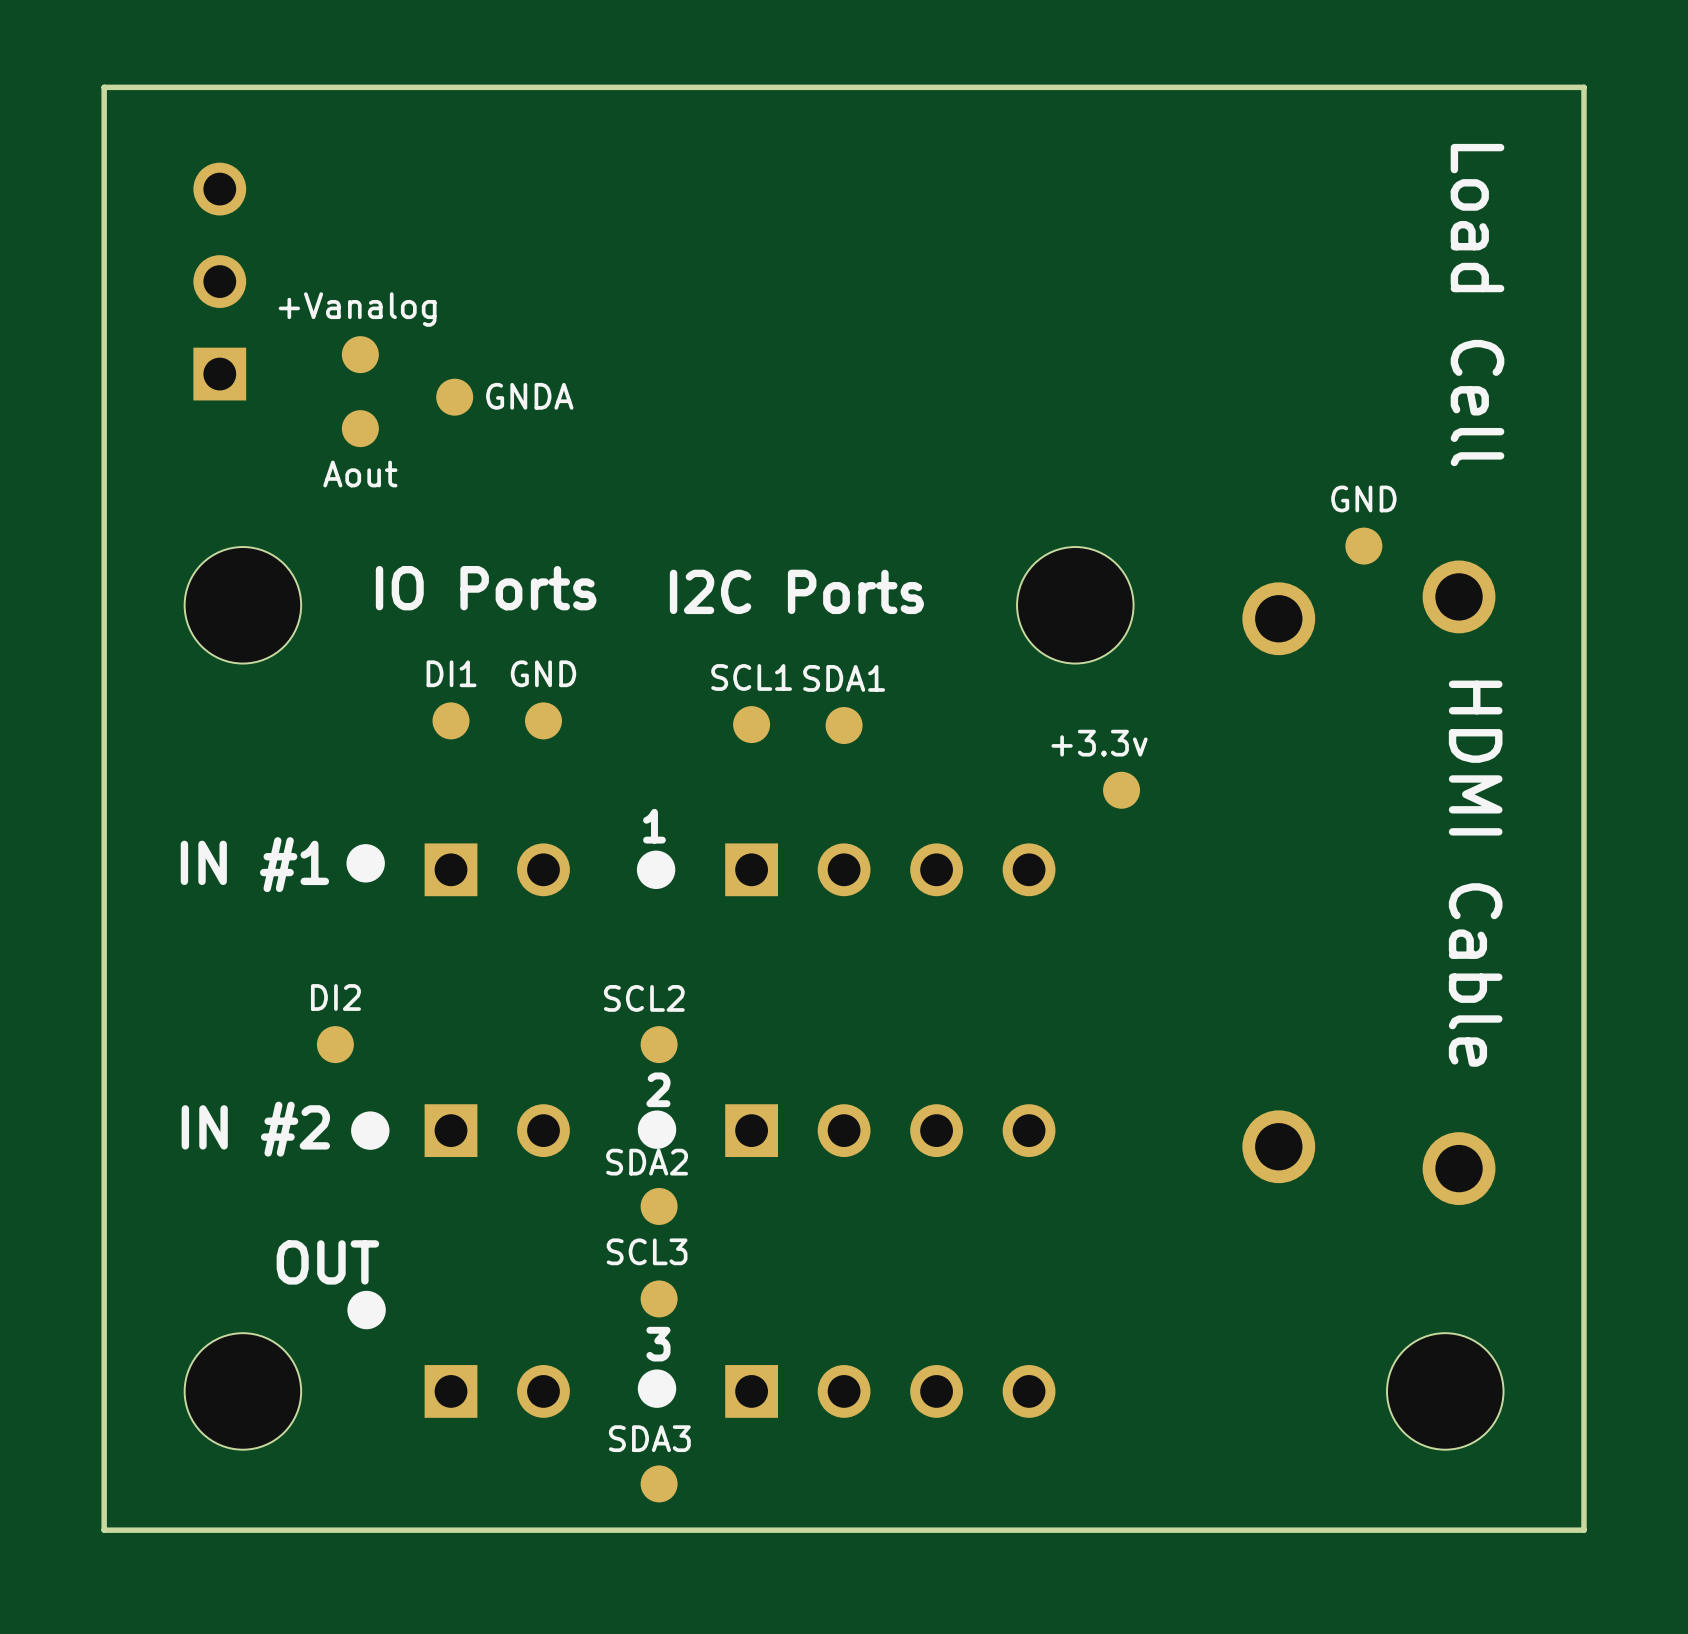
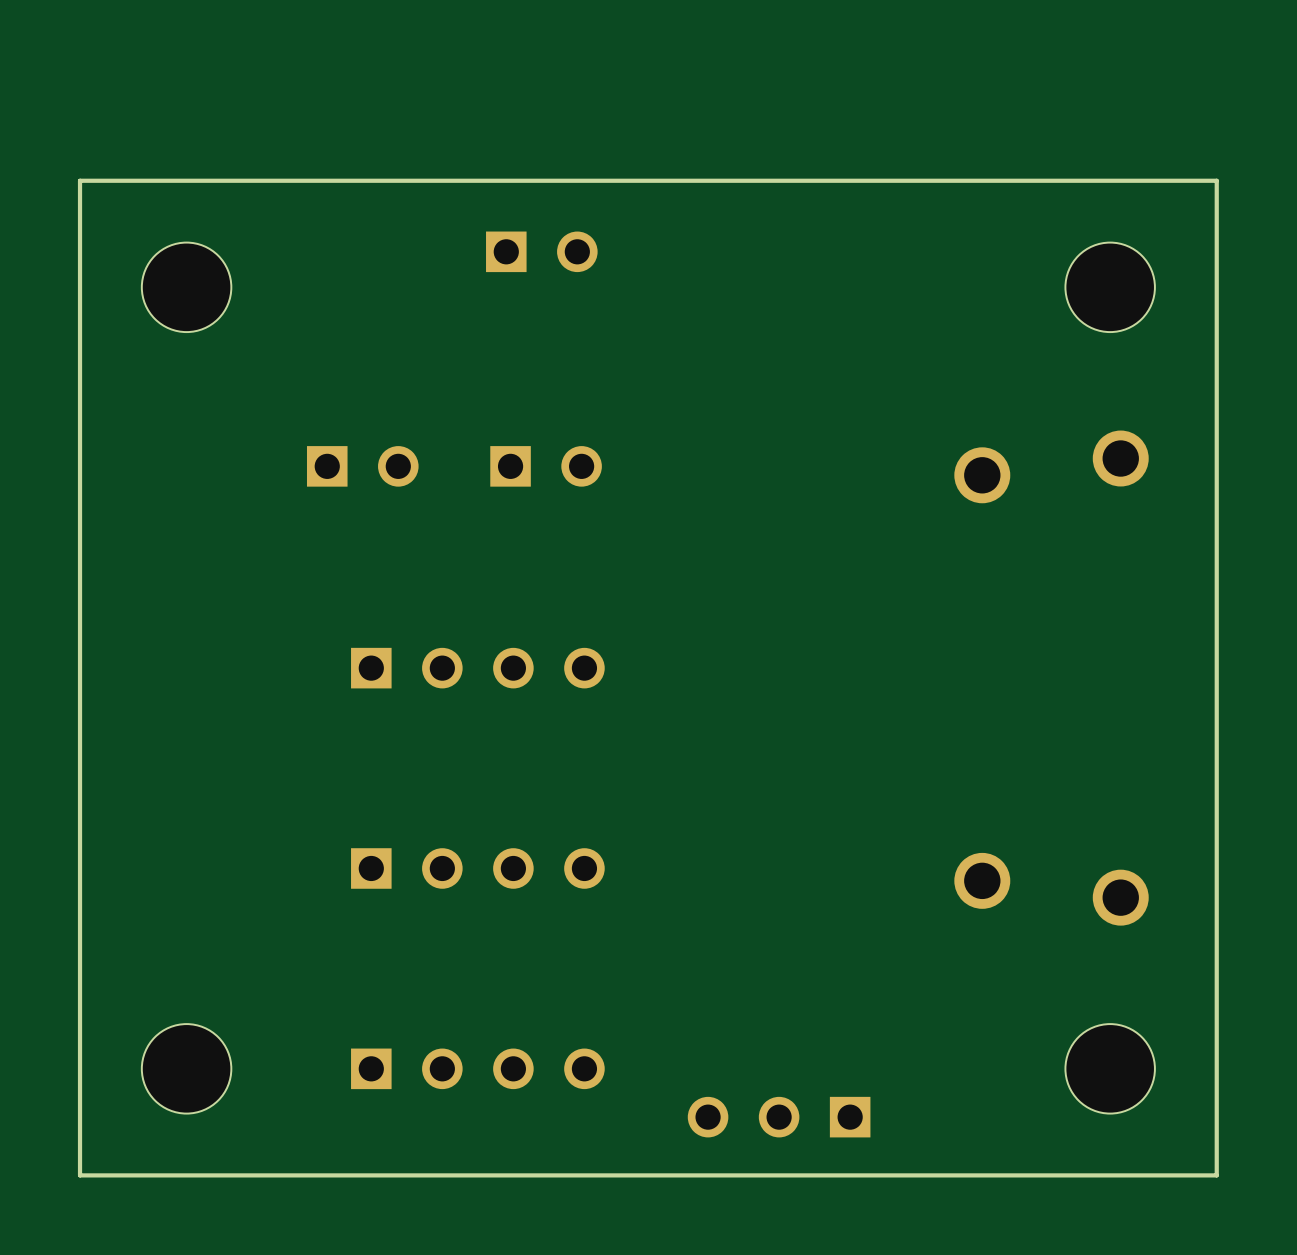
board edge: (1584, 235) (1584, 87) (104, 87) (104, 235) -> (1216, 180) (80, 180)
part: (219, 281) -> none
text: Load Cell (1477, 305) -> none
part: none -> (541, 251)
part: +Vanalog (360, 354) -> none
part: none -> (1110, 287)
part: GNDA (454, 397) -> none
part: Aout (360, 428) -> none
part: GND (1363, 546) -> none
text: IO Ports (486, 588) -> none
text: I2C Ports (796, 591) -> none
part position: (242, 605) -> (186, 287)
part: (1075, 605) -> none
part: none -> (362, 466)
part: none -> (546, 466)
part: DI1 (451, 720) -> none
part: GND (543, 720) -> none
part: SCL1 (751, 724) -> none
part: SDA1 (844, 725) -> none
part: +3.3v (1121, 790) -> none
text: 1 (654, 826) -> none
drawing: [346, 844, 385, 883] -> none
drawing: [636, 850, 676, 890] -> none
text: IN #1 (254, 864) -> none
part: (497, 869) -> none
part: none -> (477, 668)
part: (890, 869) -> none
text: HDMI Cable (1475, 873) -> none
part: DI2 (335, 1044) -> none
part: SCL2 (659, 1044) -> none
text: 2 (658, 1089) -> none
drawing: [637, 1110, 677, 1149] -> none
drawing: [351, 1111, 390, 1150] -> none
text: IN #2 (255, 1129) -> none
part: (497, 1130) -> none
part: none -> (477, 868)
part: (890, 1130) -> none
part: SDA2 (659, 1206) -> none
text: OUT (327, 1262) -> none
drawing: [347, 1290, 386, 1330] -> none
part: SCL3 (659, 1298) -> none
text: 3 (658, 1344) -> none
drawing: [637, 1369, 677, 1408] -> none
part: (497, 1391) -> none
part: none -> (477, 1068)
part: (890, 1391) -> none
part: none -> (779, 1117)
part: SDA3 (659, 1483) -> none

